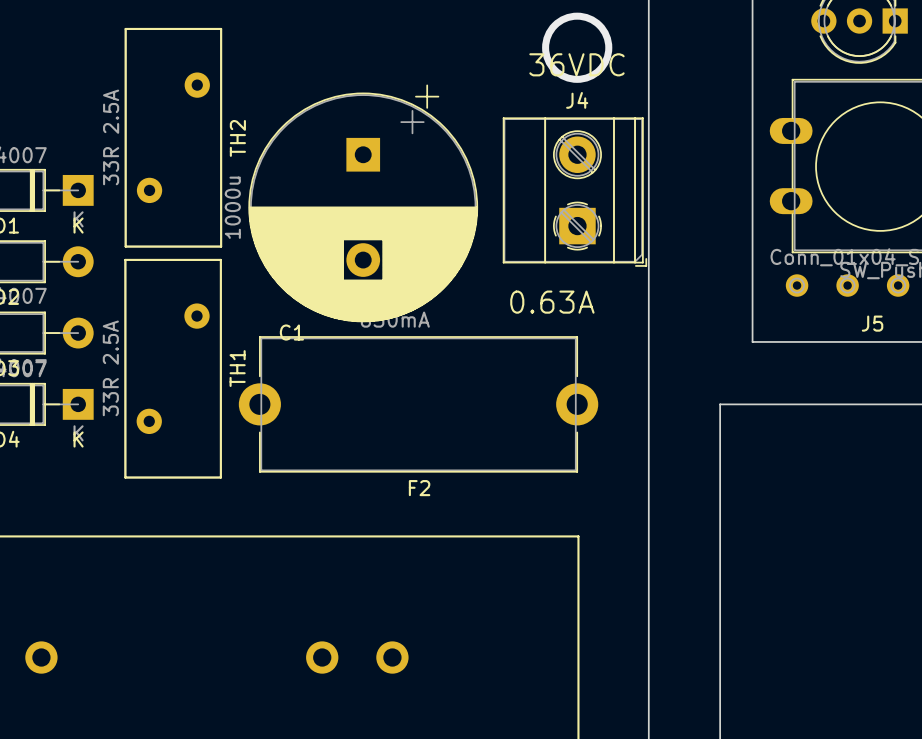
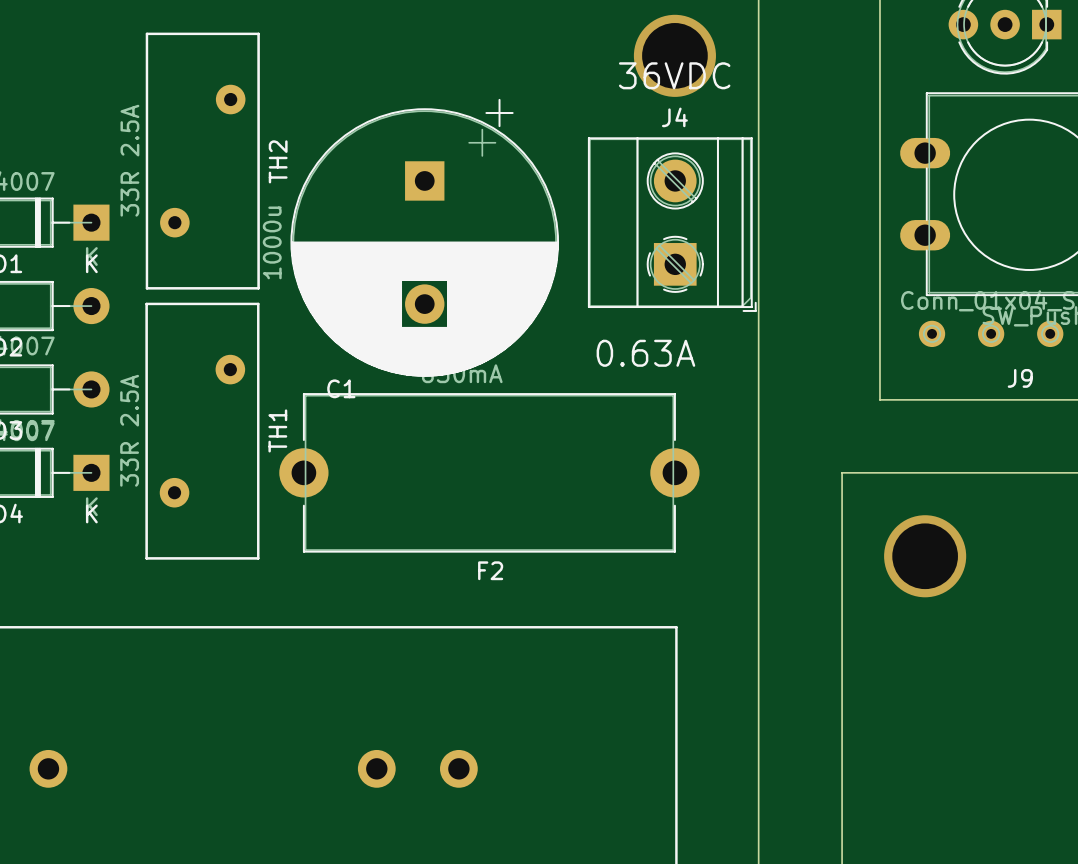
J5 name: J5 (872, 323) -> J9 (1020, 378)
via: none -> (925, 556)

